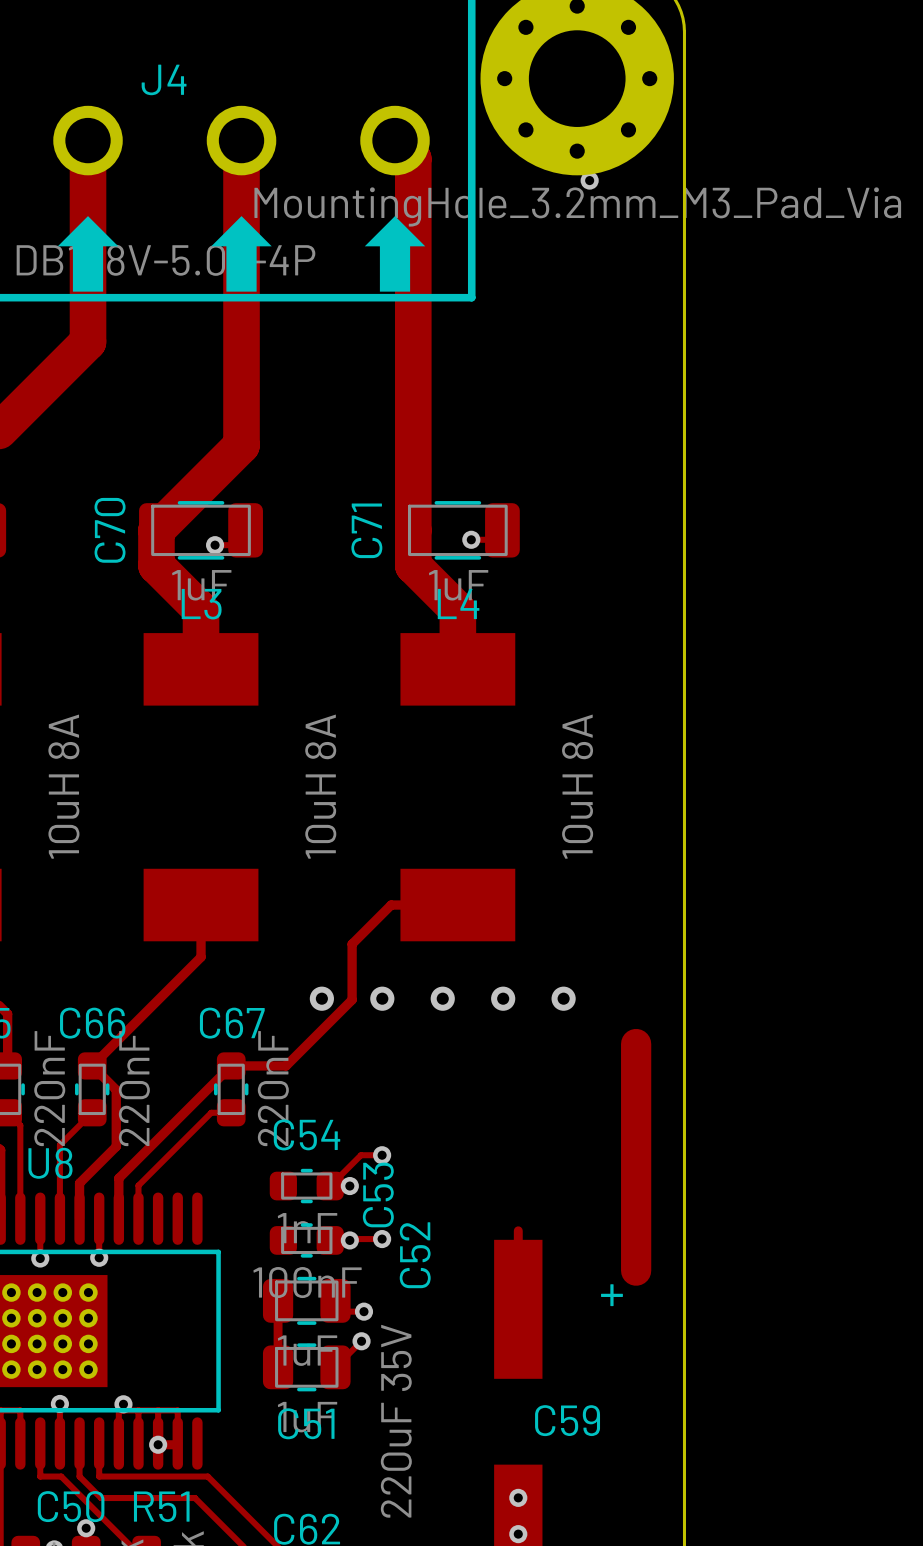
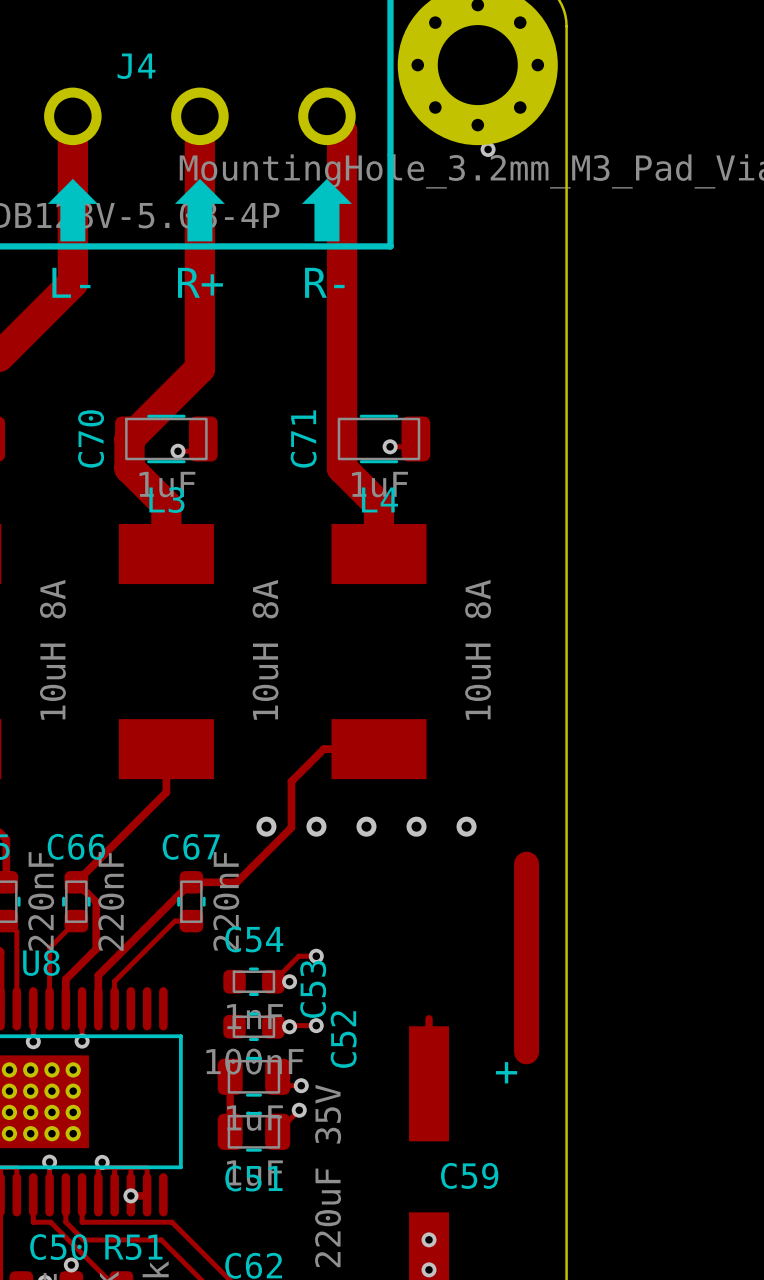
text: none -> L- (71, 282)
text: none -> R+ (200, 282)
text: none -> R- (324, 282)

